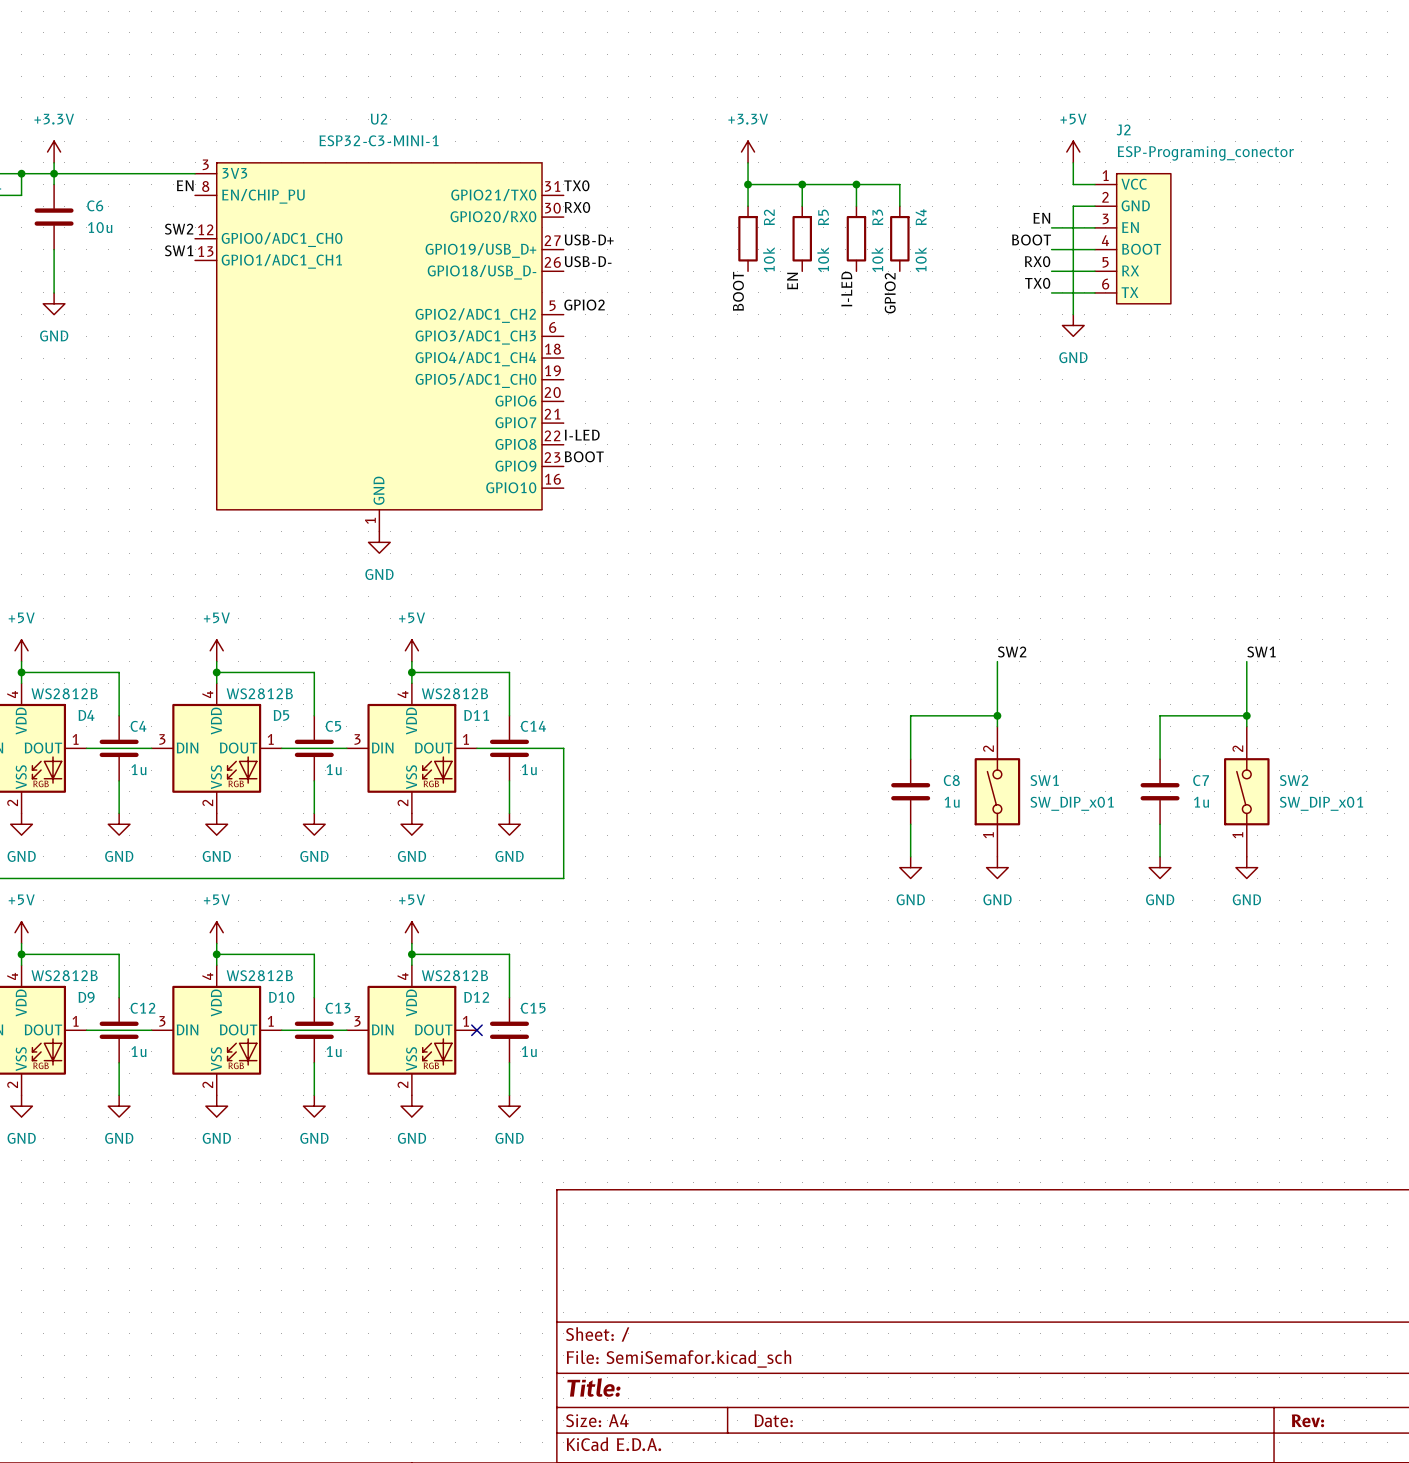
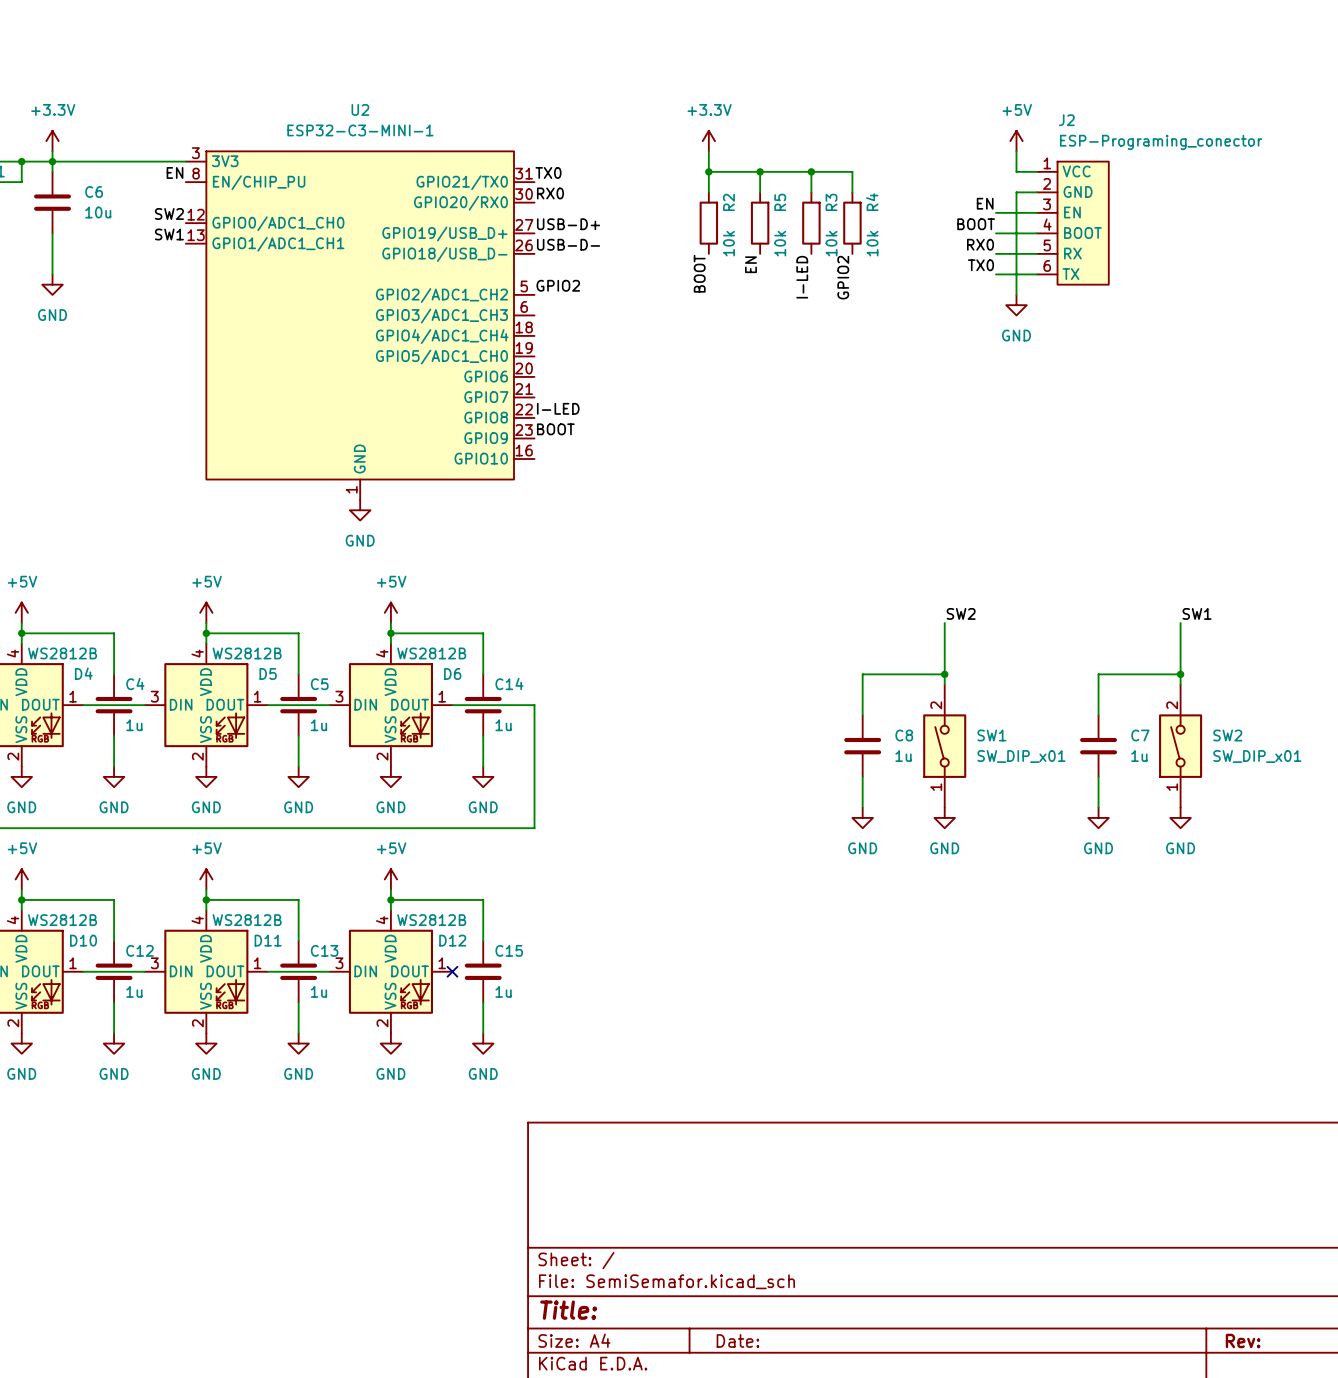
D11 name: D11 (476, 715) -> D6 (452, 673)
D9 name: D9 (86, 997) -> D10 (83, 940)
D10 name: D10 (281, 997) -> D11 (268, 940)

